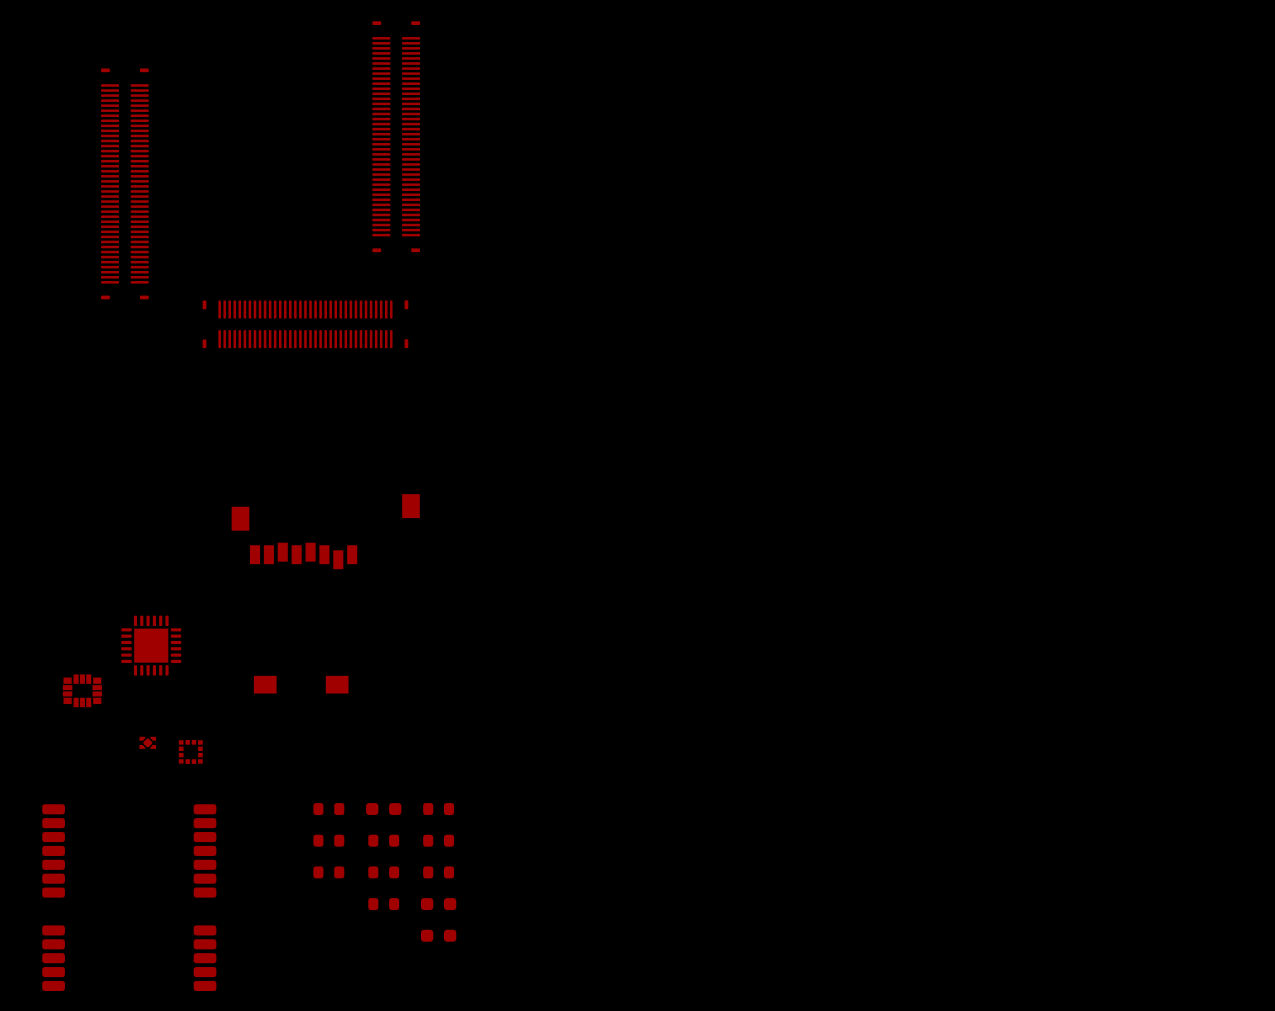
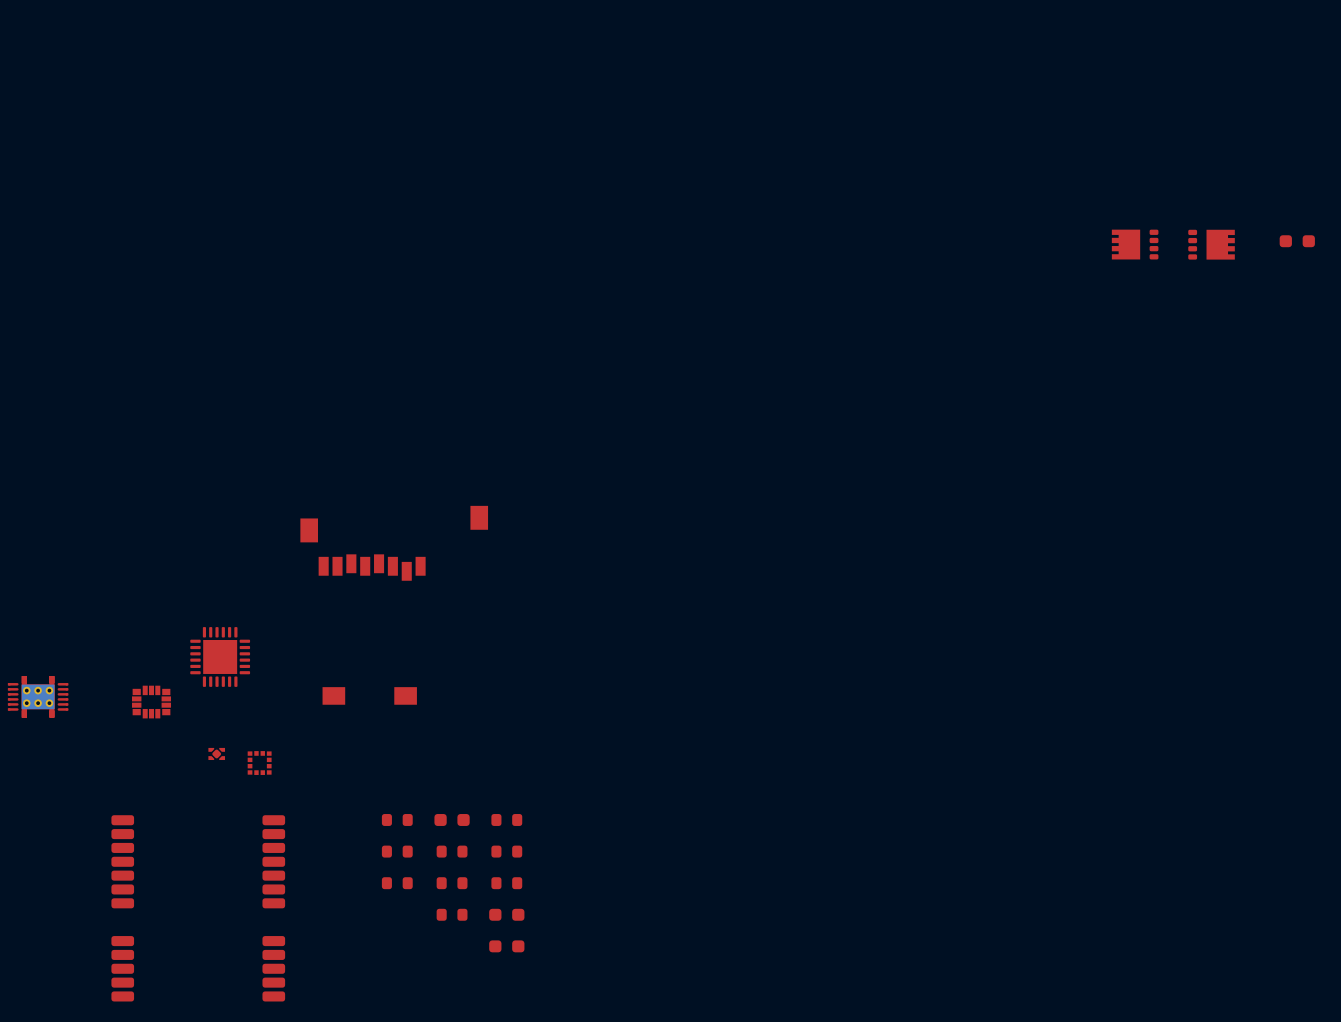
part: (396, 136) -> none
part: (124, 183) -> none
part: none -> (1297, 241)
part: none -> (1135, 244)
part: none -> (1211, 244)
part: (305, 324) -> none

